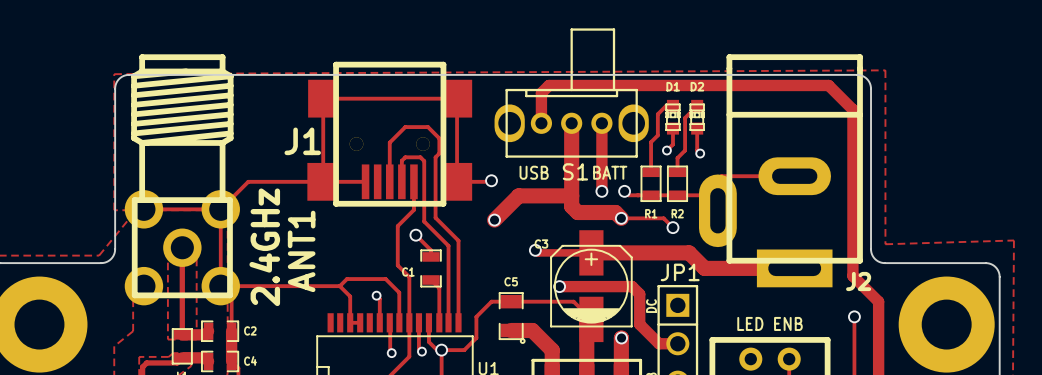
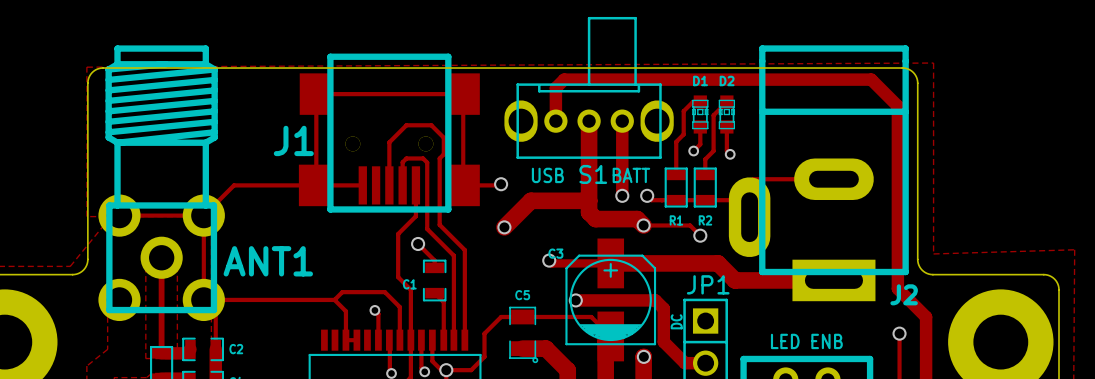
text: 2.4GHz (264, 247) -> none
ANT1 name rotation: 0° (301, 251) -> 90° clockwise (268, 261)

